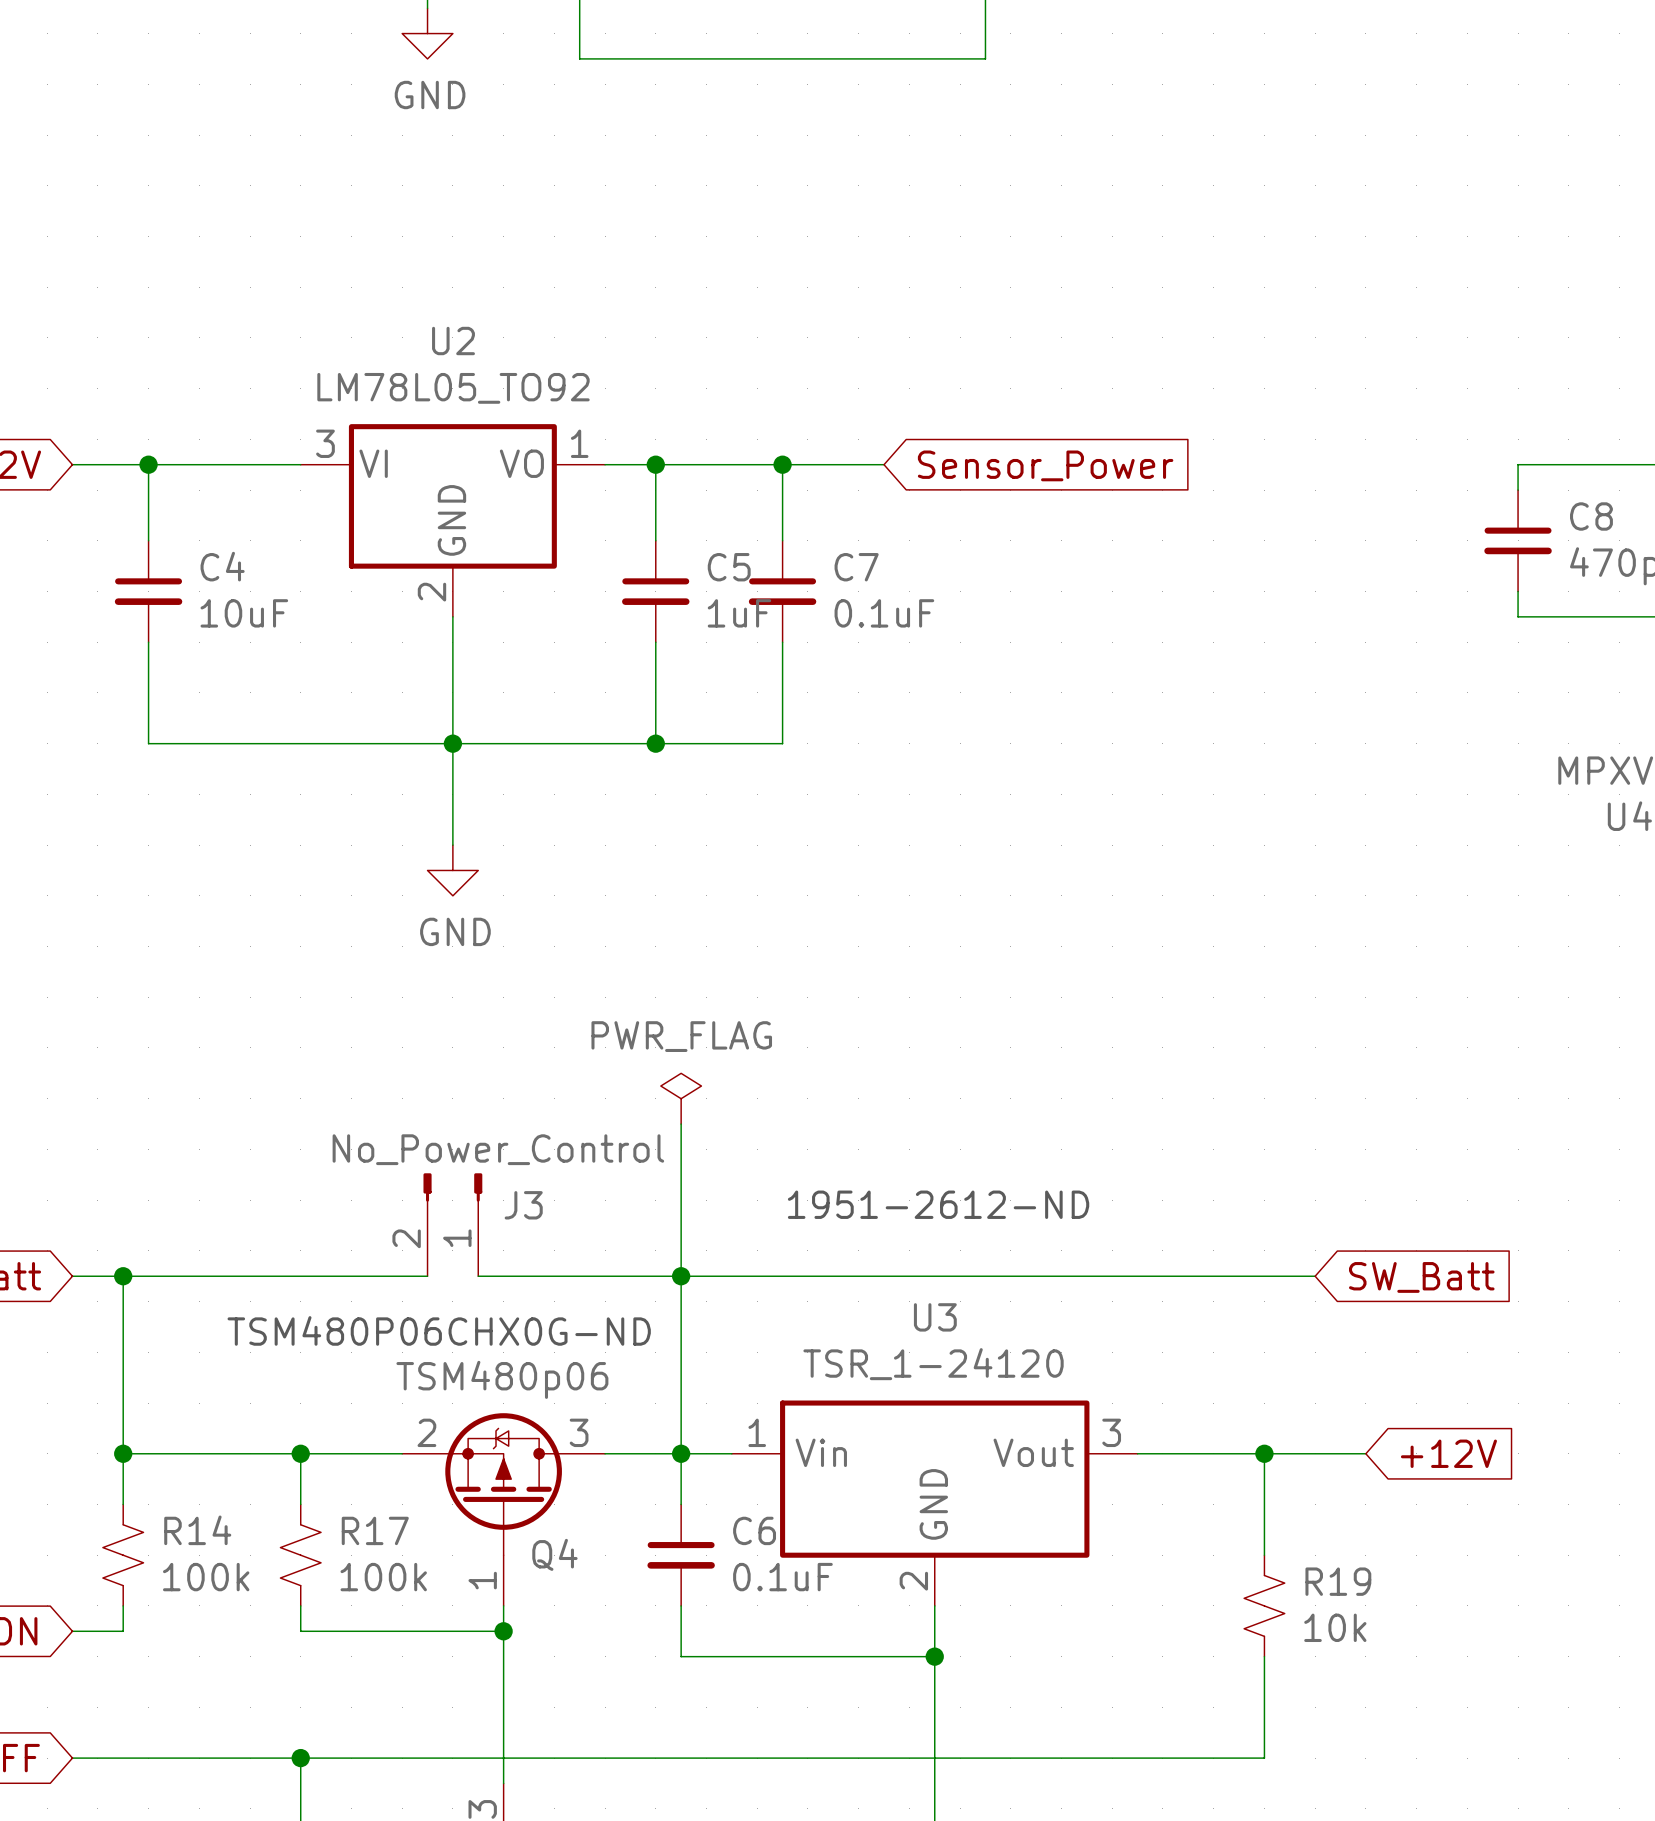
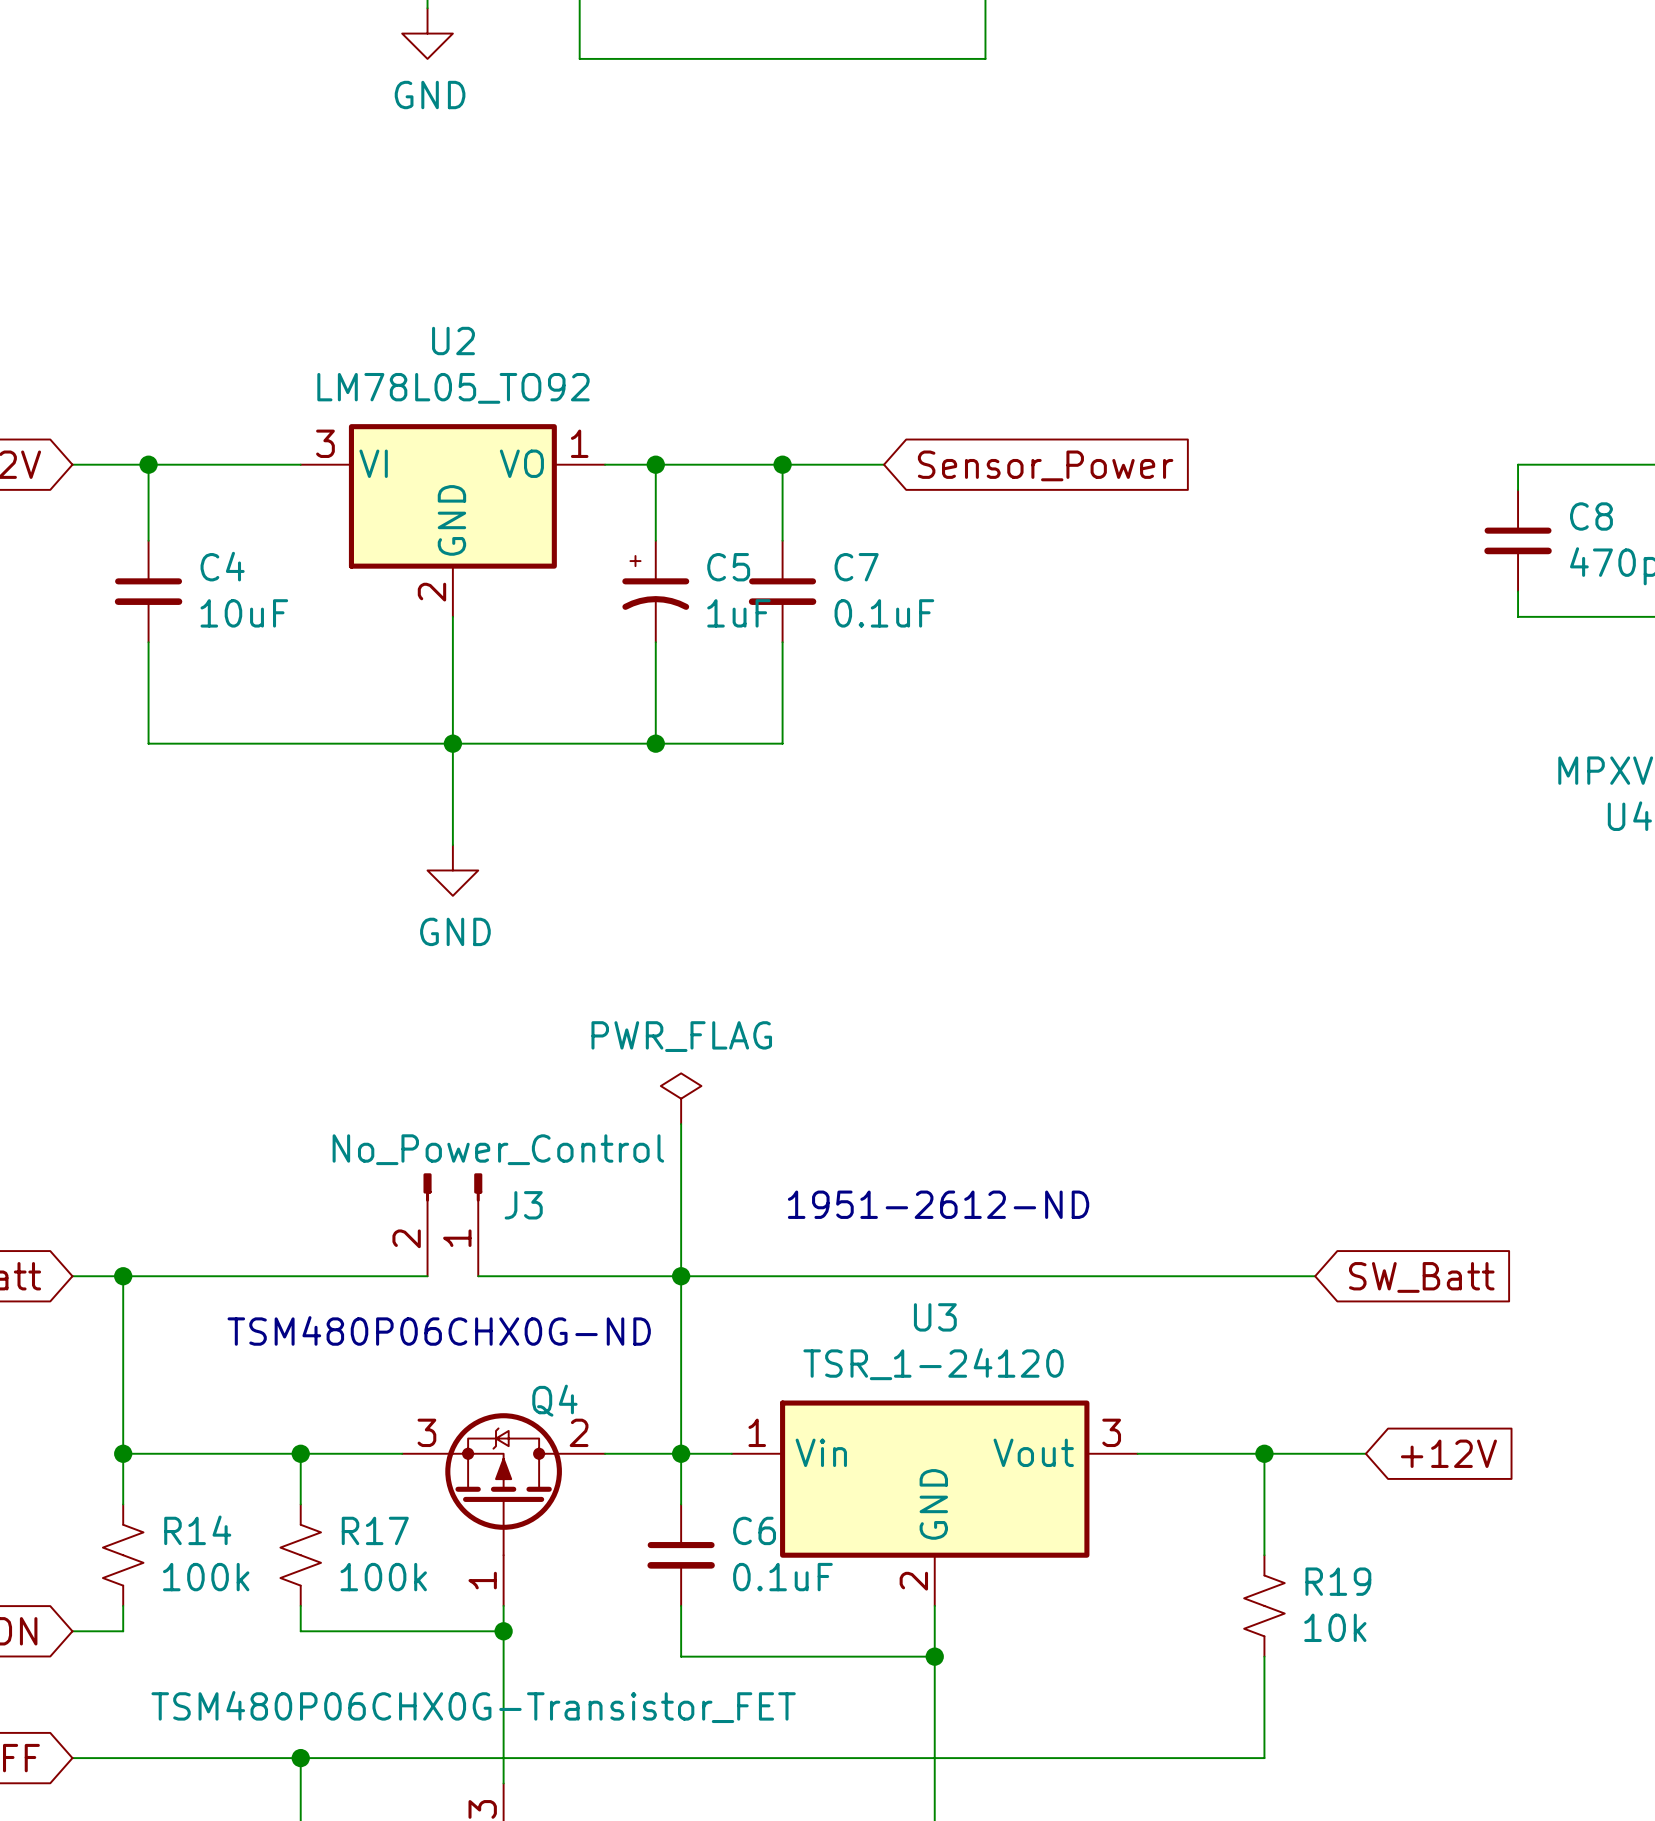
C5 symbol: [622, 540, 690, 643] -> [622, 540, 690, 643]
Q4 value: TSM480p06 (502, 1379) -> TSM480P06CHX0G-Transistor_FET (473, 1707)
Q4 pin number: 2 (426, 1432) -> 3 (426, 1432)
Q4 pin number: 3 (579, 1432) -> 2 (579, 1432)
Q4 name position: Q4 (554, 1554) -> Q4 (554, 1400)

